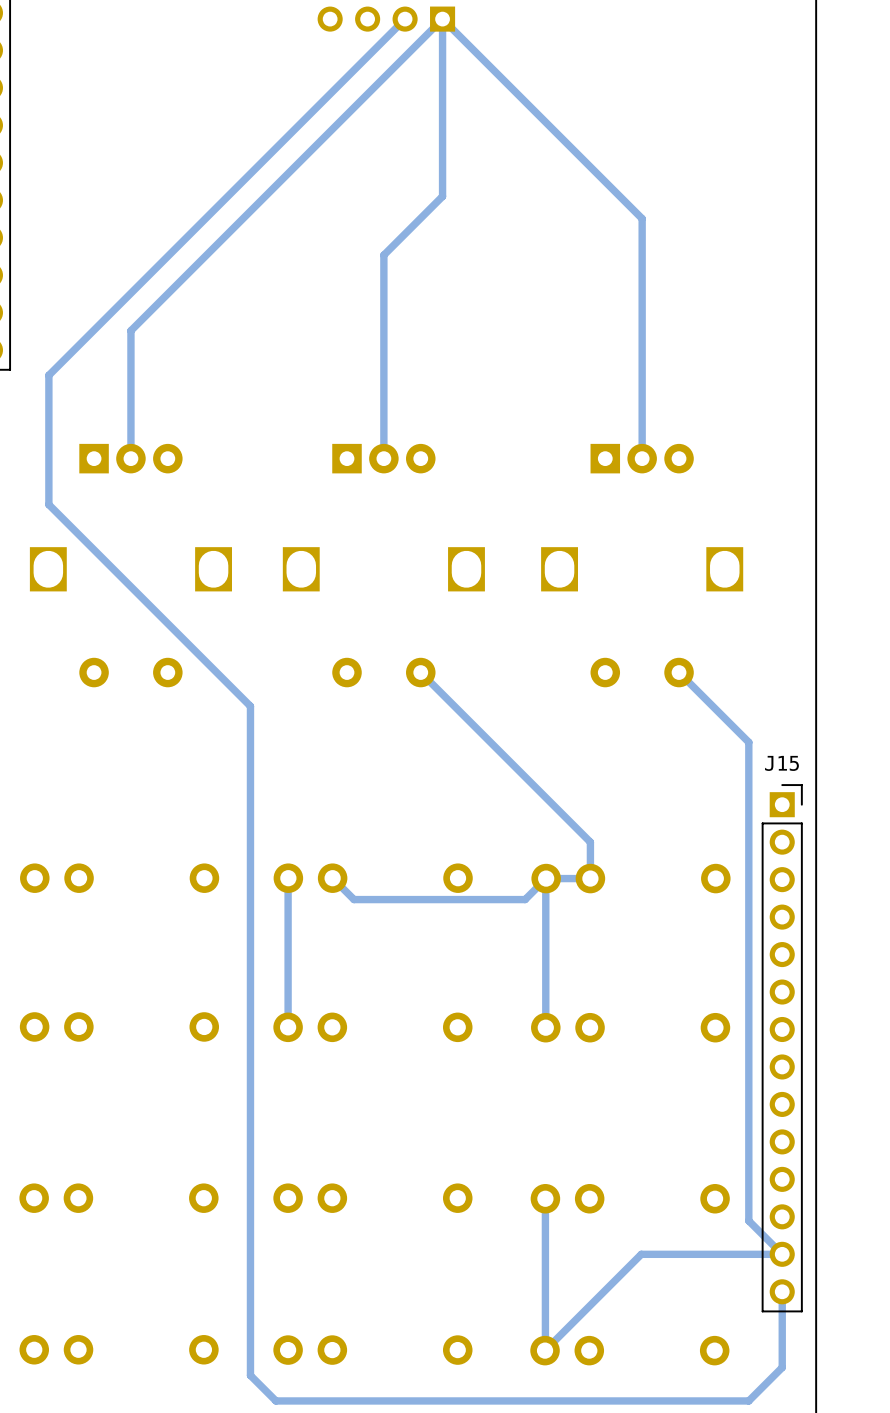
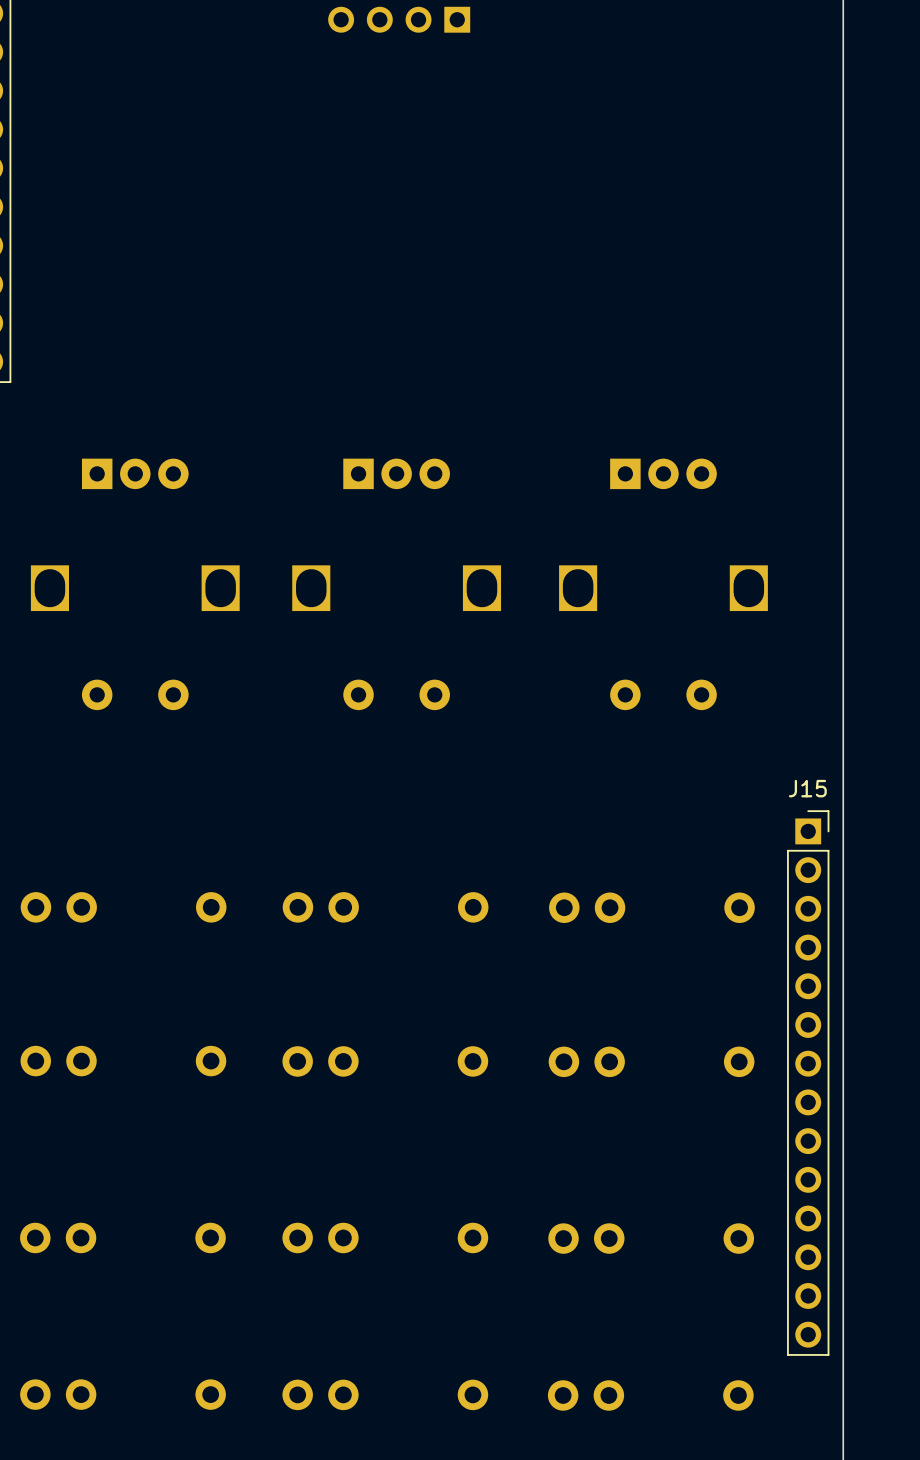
track: (405, 19) (48, 375) (48, 504) (250, 706) (250, 1375) (275, 1400) (748, 1400) (782, 1367) (782, 1291) -> none
track: (442, 19) (442, 196) (383, 255) (383, 458) -> none
track: (442, 19) (130, 330) (130, 458) -> none
track: (442, 19) (642, 218) (642, 458) -> none
track: (420, 672) (590, 842) (590, 878) (546, 878) (525, 899) (354, 899) (332, 878) -> none
track: (679, 672) (748, 742) (748, 1220) (782, 1254) (641, 1254) (545, 1350) -> none
track: (288, 878) (288, 1027) -> none
track: (545, 878) (545, 1027) -> none
track: (545, 1198) (545, 1350) -> none

